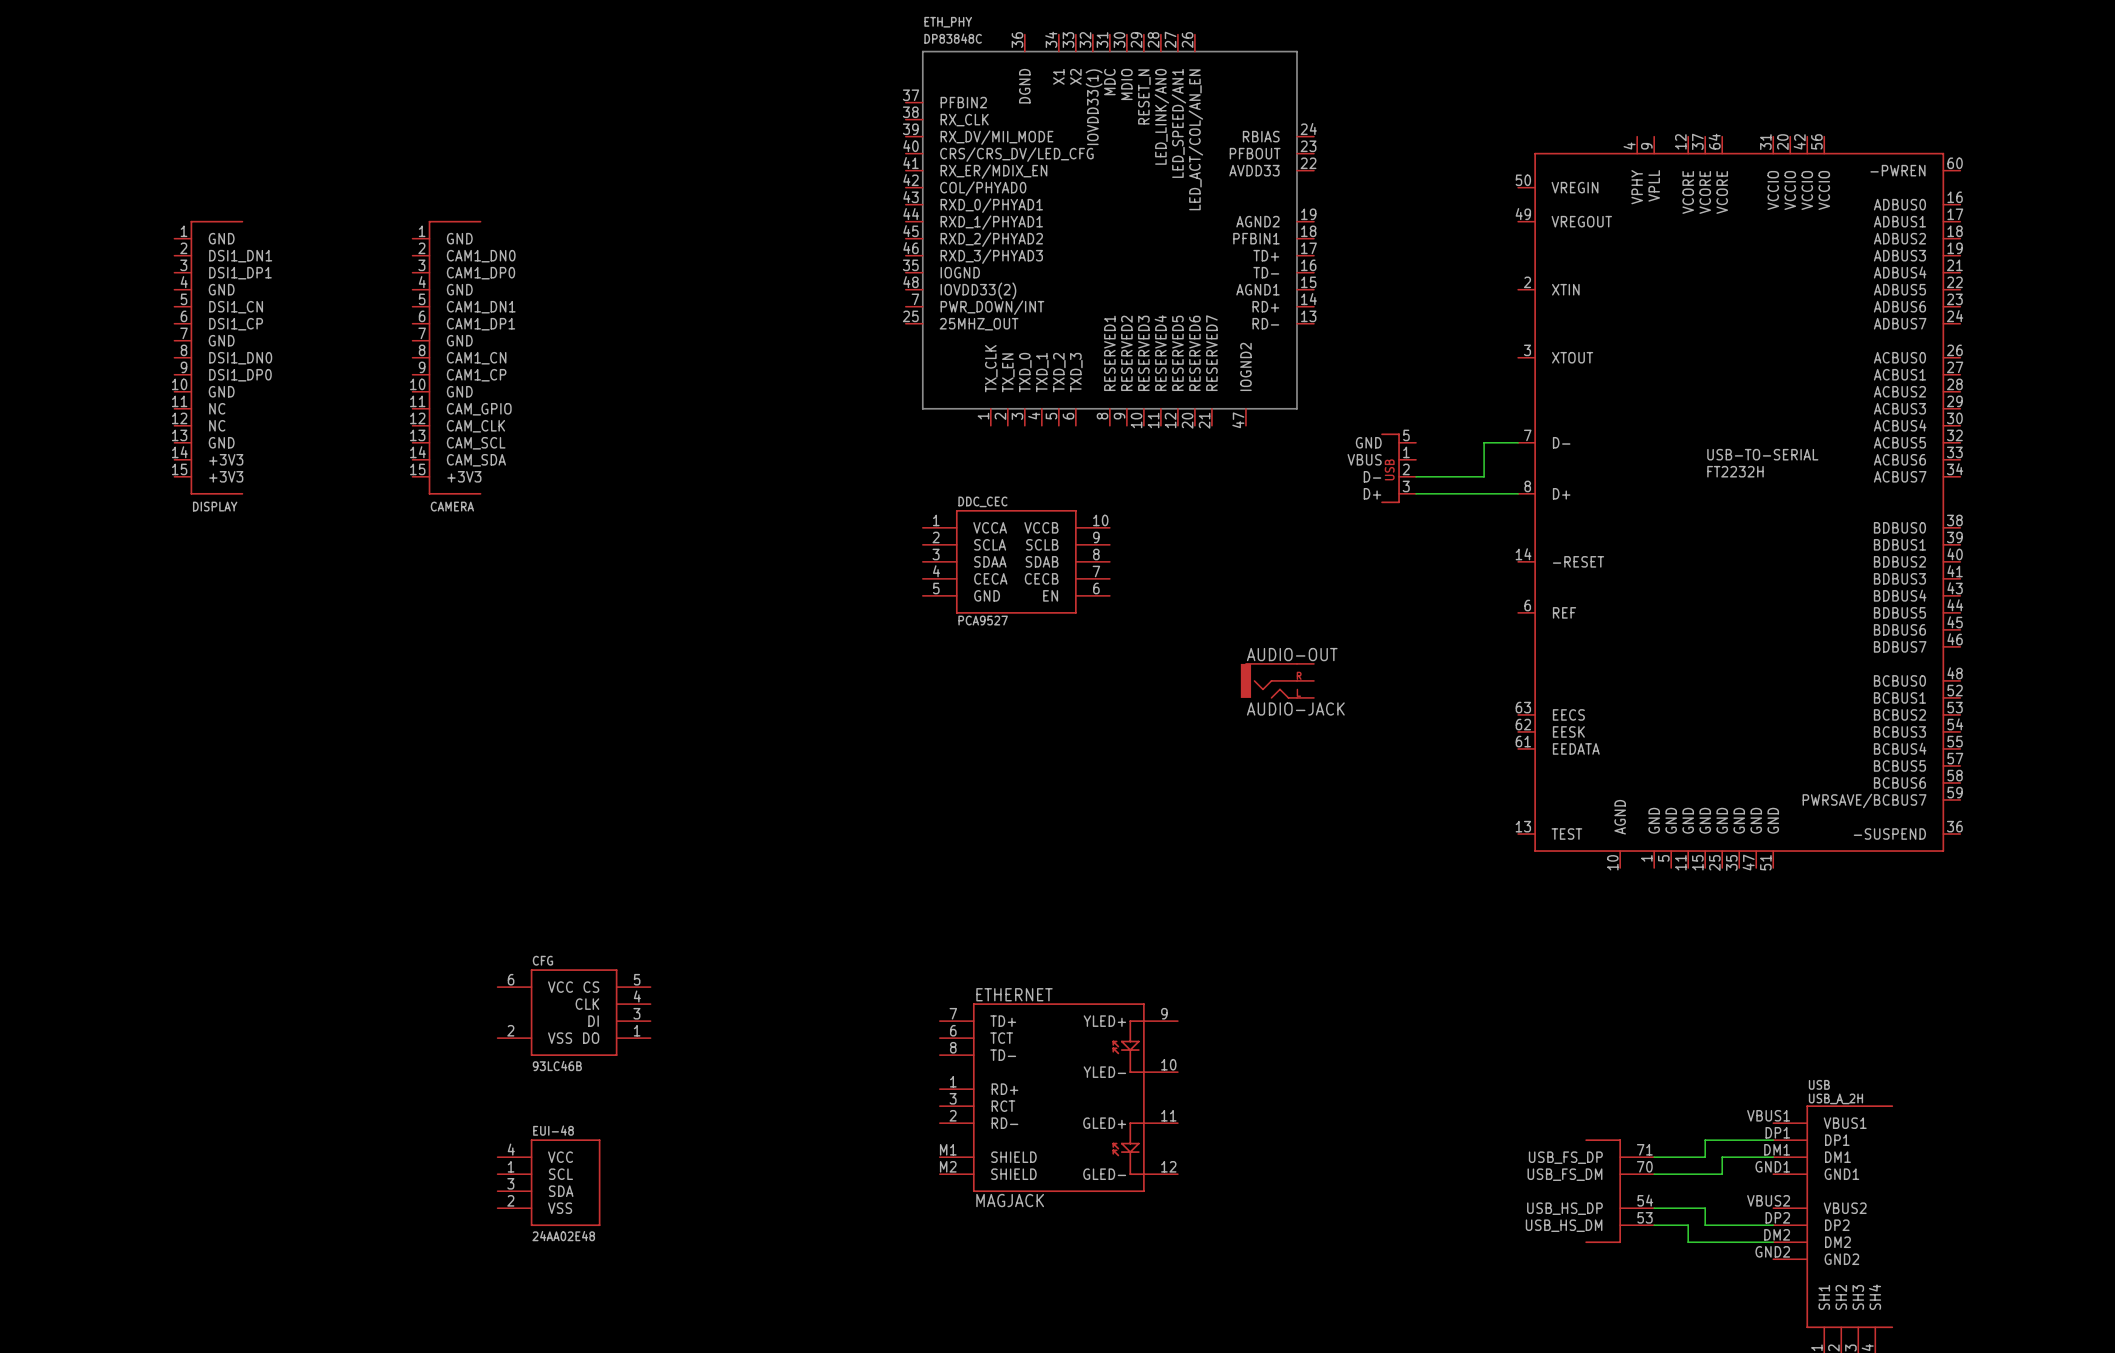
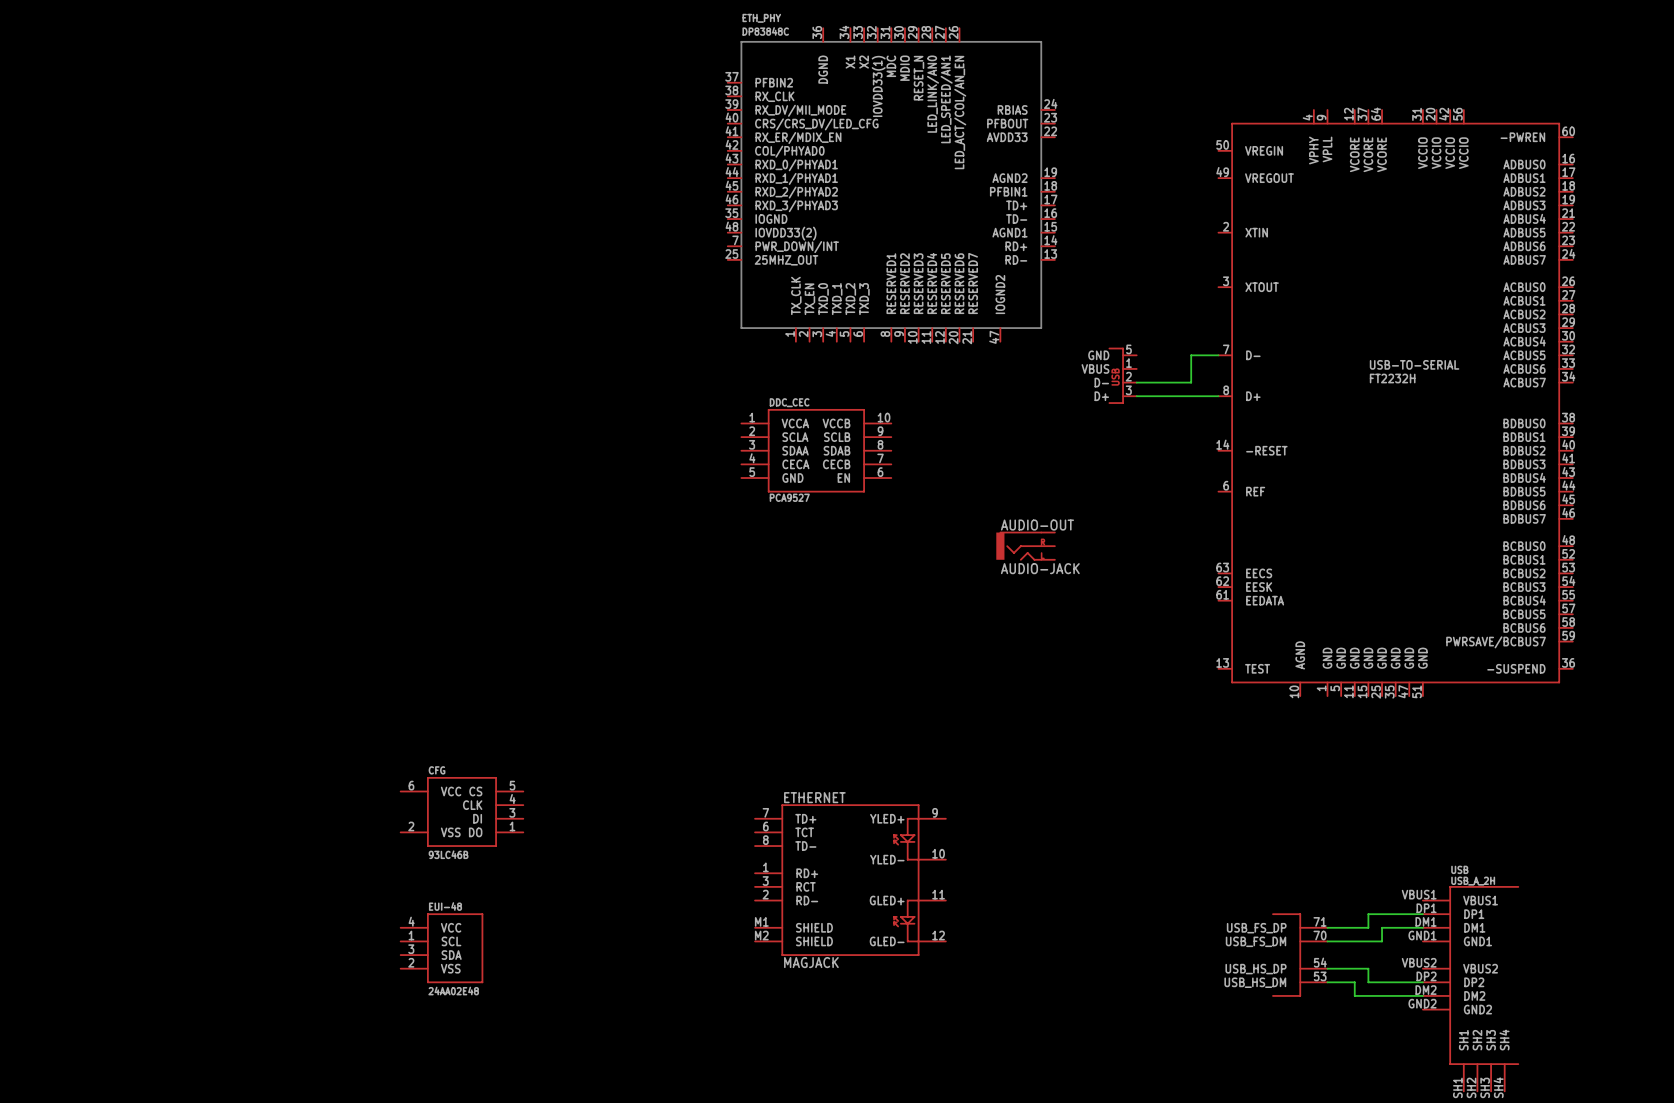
DISPLAY: (208, 357) -> none
CAMERA: (446, 357) -> none

